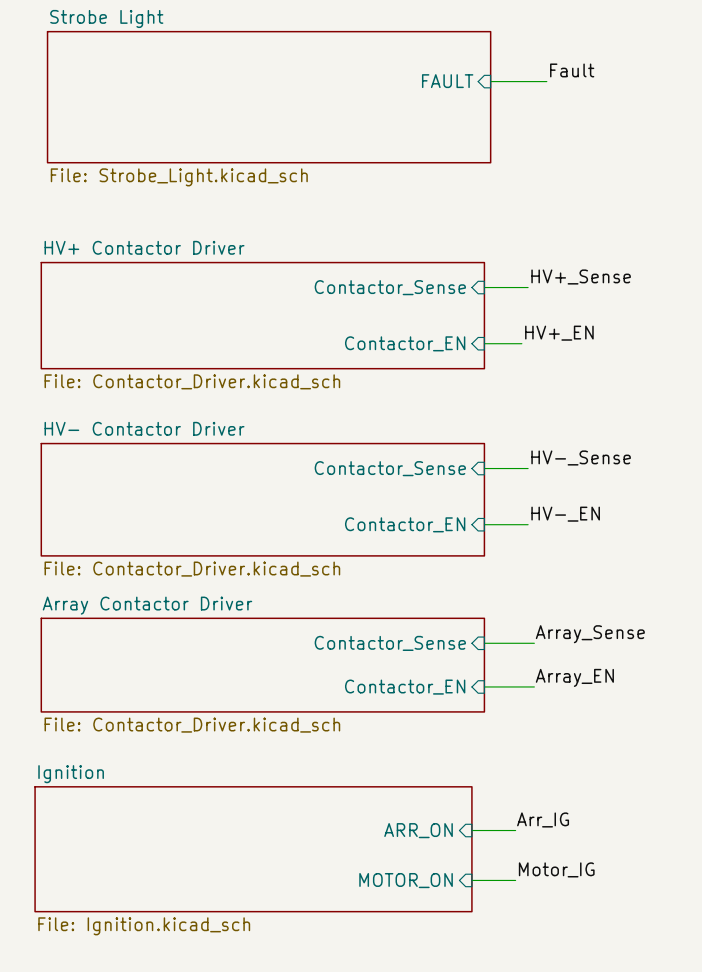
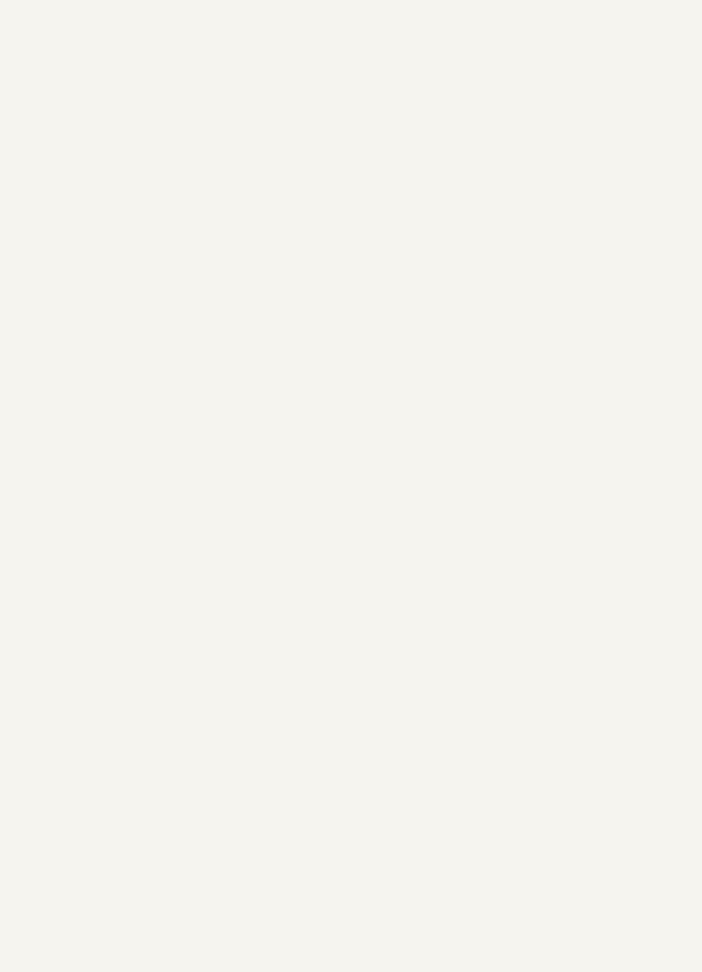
label: Fault (572, 70) -> none
sheet pin: FAULT (447, 81) -> none
wire: (490, 81) (546, 81) -> none
sheet Strobe Light: File: Strobe_Light.kicad_sch (269, 97) -> none
label: HV+_Sense (581, 276) -> none
sheet pin: Contactor_Sense (390, 287) -> none
wire: (484, 287) (528, 287) -> none
sheet HV+ Contactor Driver: File: Contactor_Driver.kicad_sch (262, 315) -> none
label: HV+_EN (559, 333) -> none
sheet pin: Contactor_EN (405, 343) -> none
wire: (484, 343) (521, 343) -> none
label: HV-_Sense (581, 457) -> none
sheet pin: Contactor_Sense (390, 468) -> none
wire: (484, 468) (528, 468) -> none
sheet HV- Contactor Driver: File: Contactor_Driver.kicad_sch (262, 499) -> none
label: HV-_EN (565, 514) -> none
sheet pin: Contactor_EN (405, 524) -> none
wire: (484, 524) (528, 524) -> none
label: Array_Sense (590, 634) -> none
sheet pin: Contactor_Sense (390, 643) -> none
wire: (484, 643) (534, 643) -> none
sheet Array Contactor Driver: File: Contactor_Driver.kicad_sch (262, 665) -> none
label: Array_EN (574, 677) -> none
wire: (484, 686) (534, 686) -> none
sheet pin: Contactor_EN (405, 687) -> none
label: Arr_IG (543, 819) -> none
sheet pin: ARR_ON (418, 830) -> none
wire: (471, 830) (515, 830) -> none
sheet Ignition: File: Ignition.kicad_sch (253, 849) -> none
label: Motor_IG (556, 869) -> none
sheet pin: MOTOR_ON (406, 880) -> none
wire: (471, 880) (515, 880) -> none

